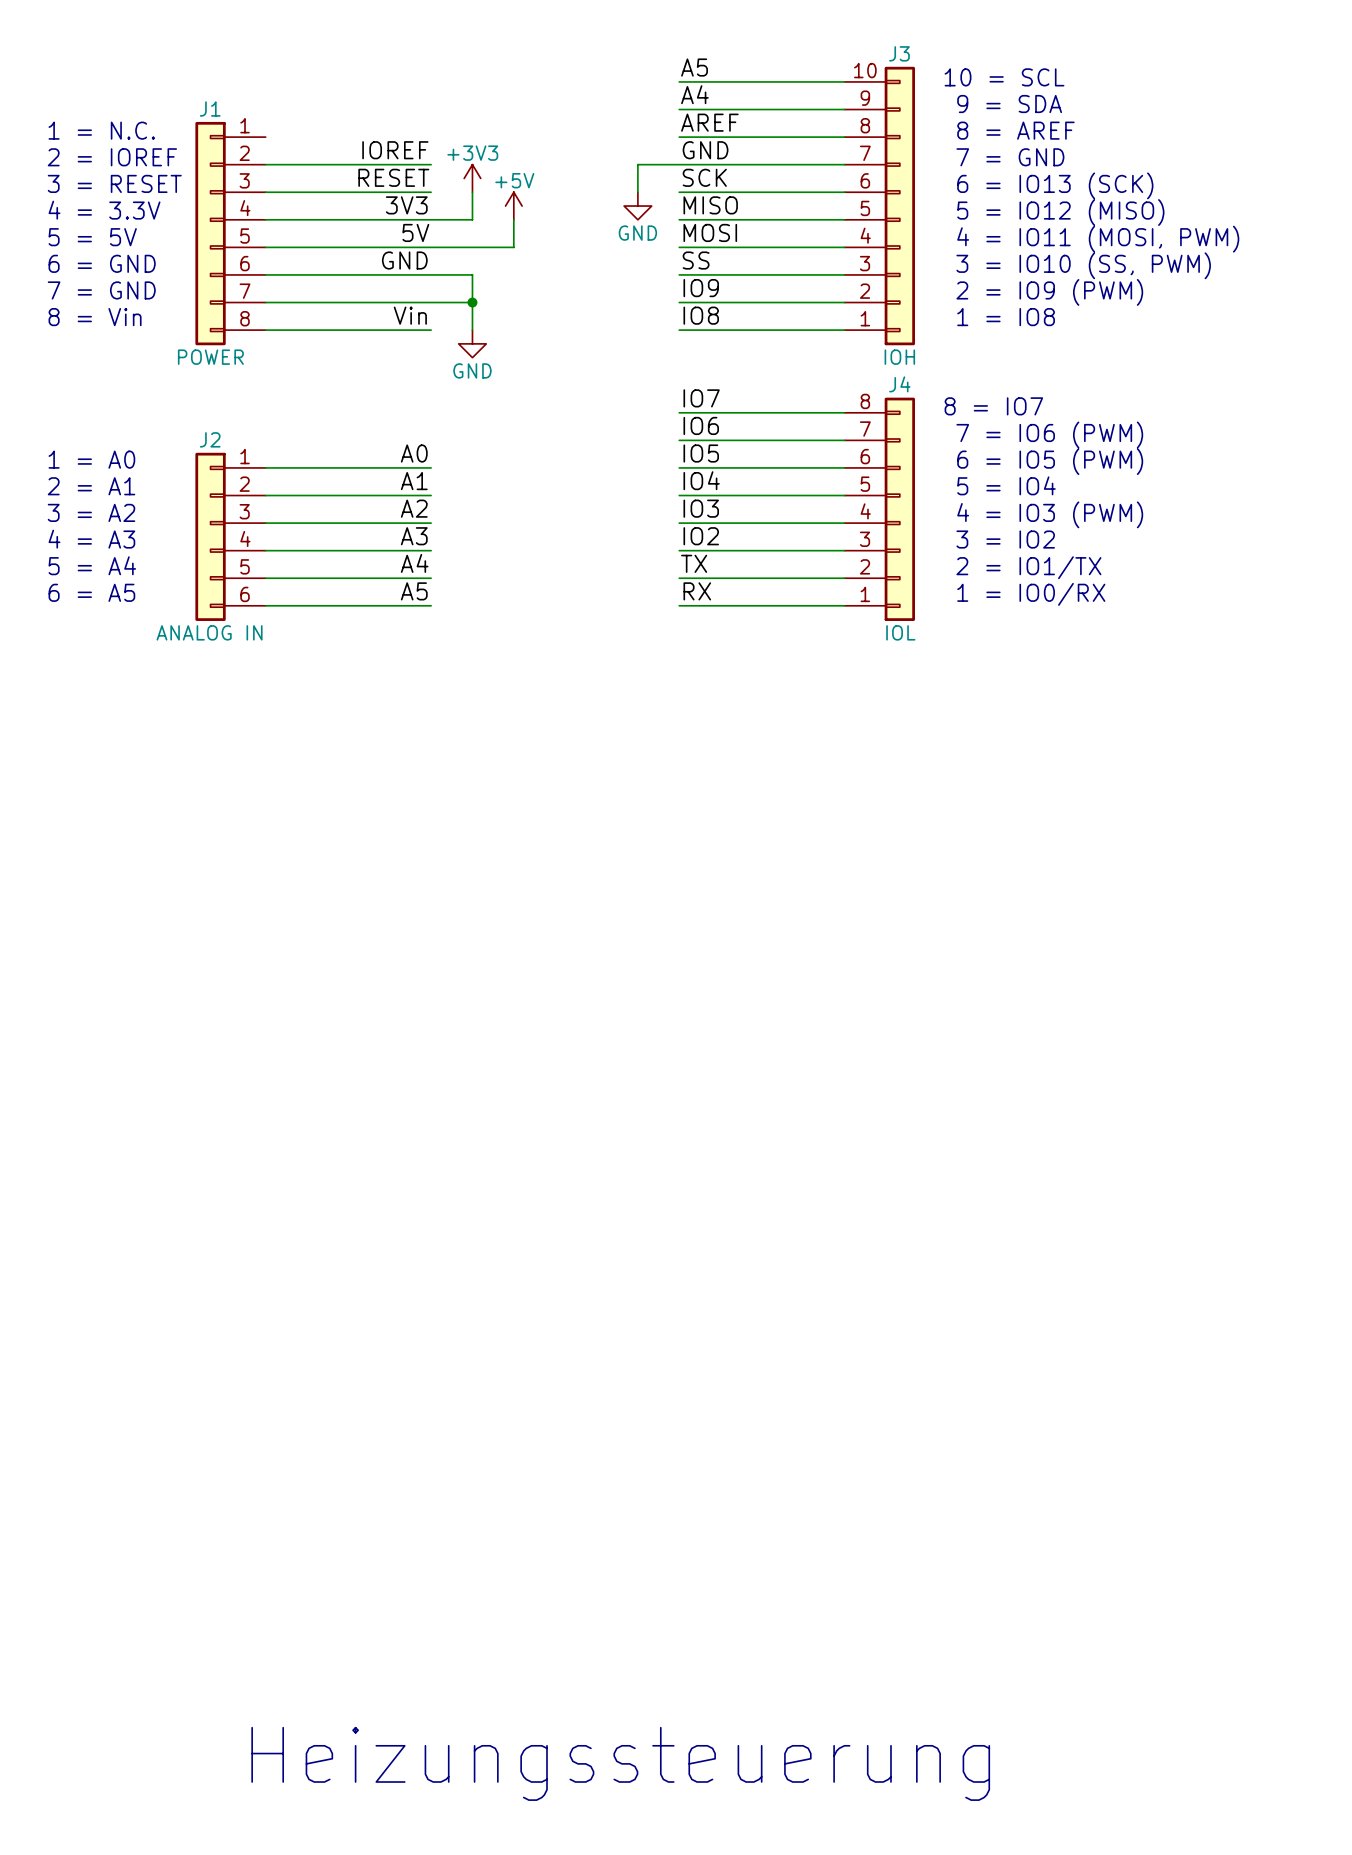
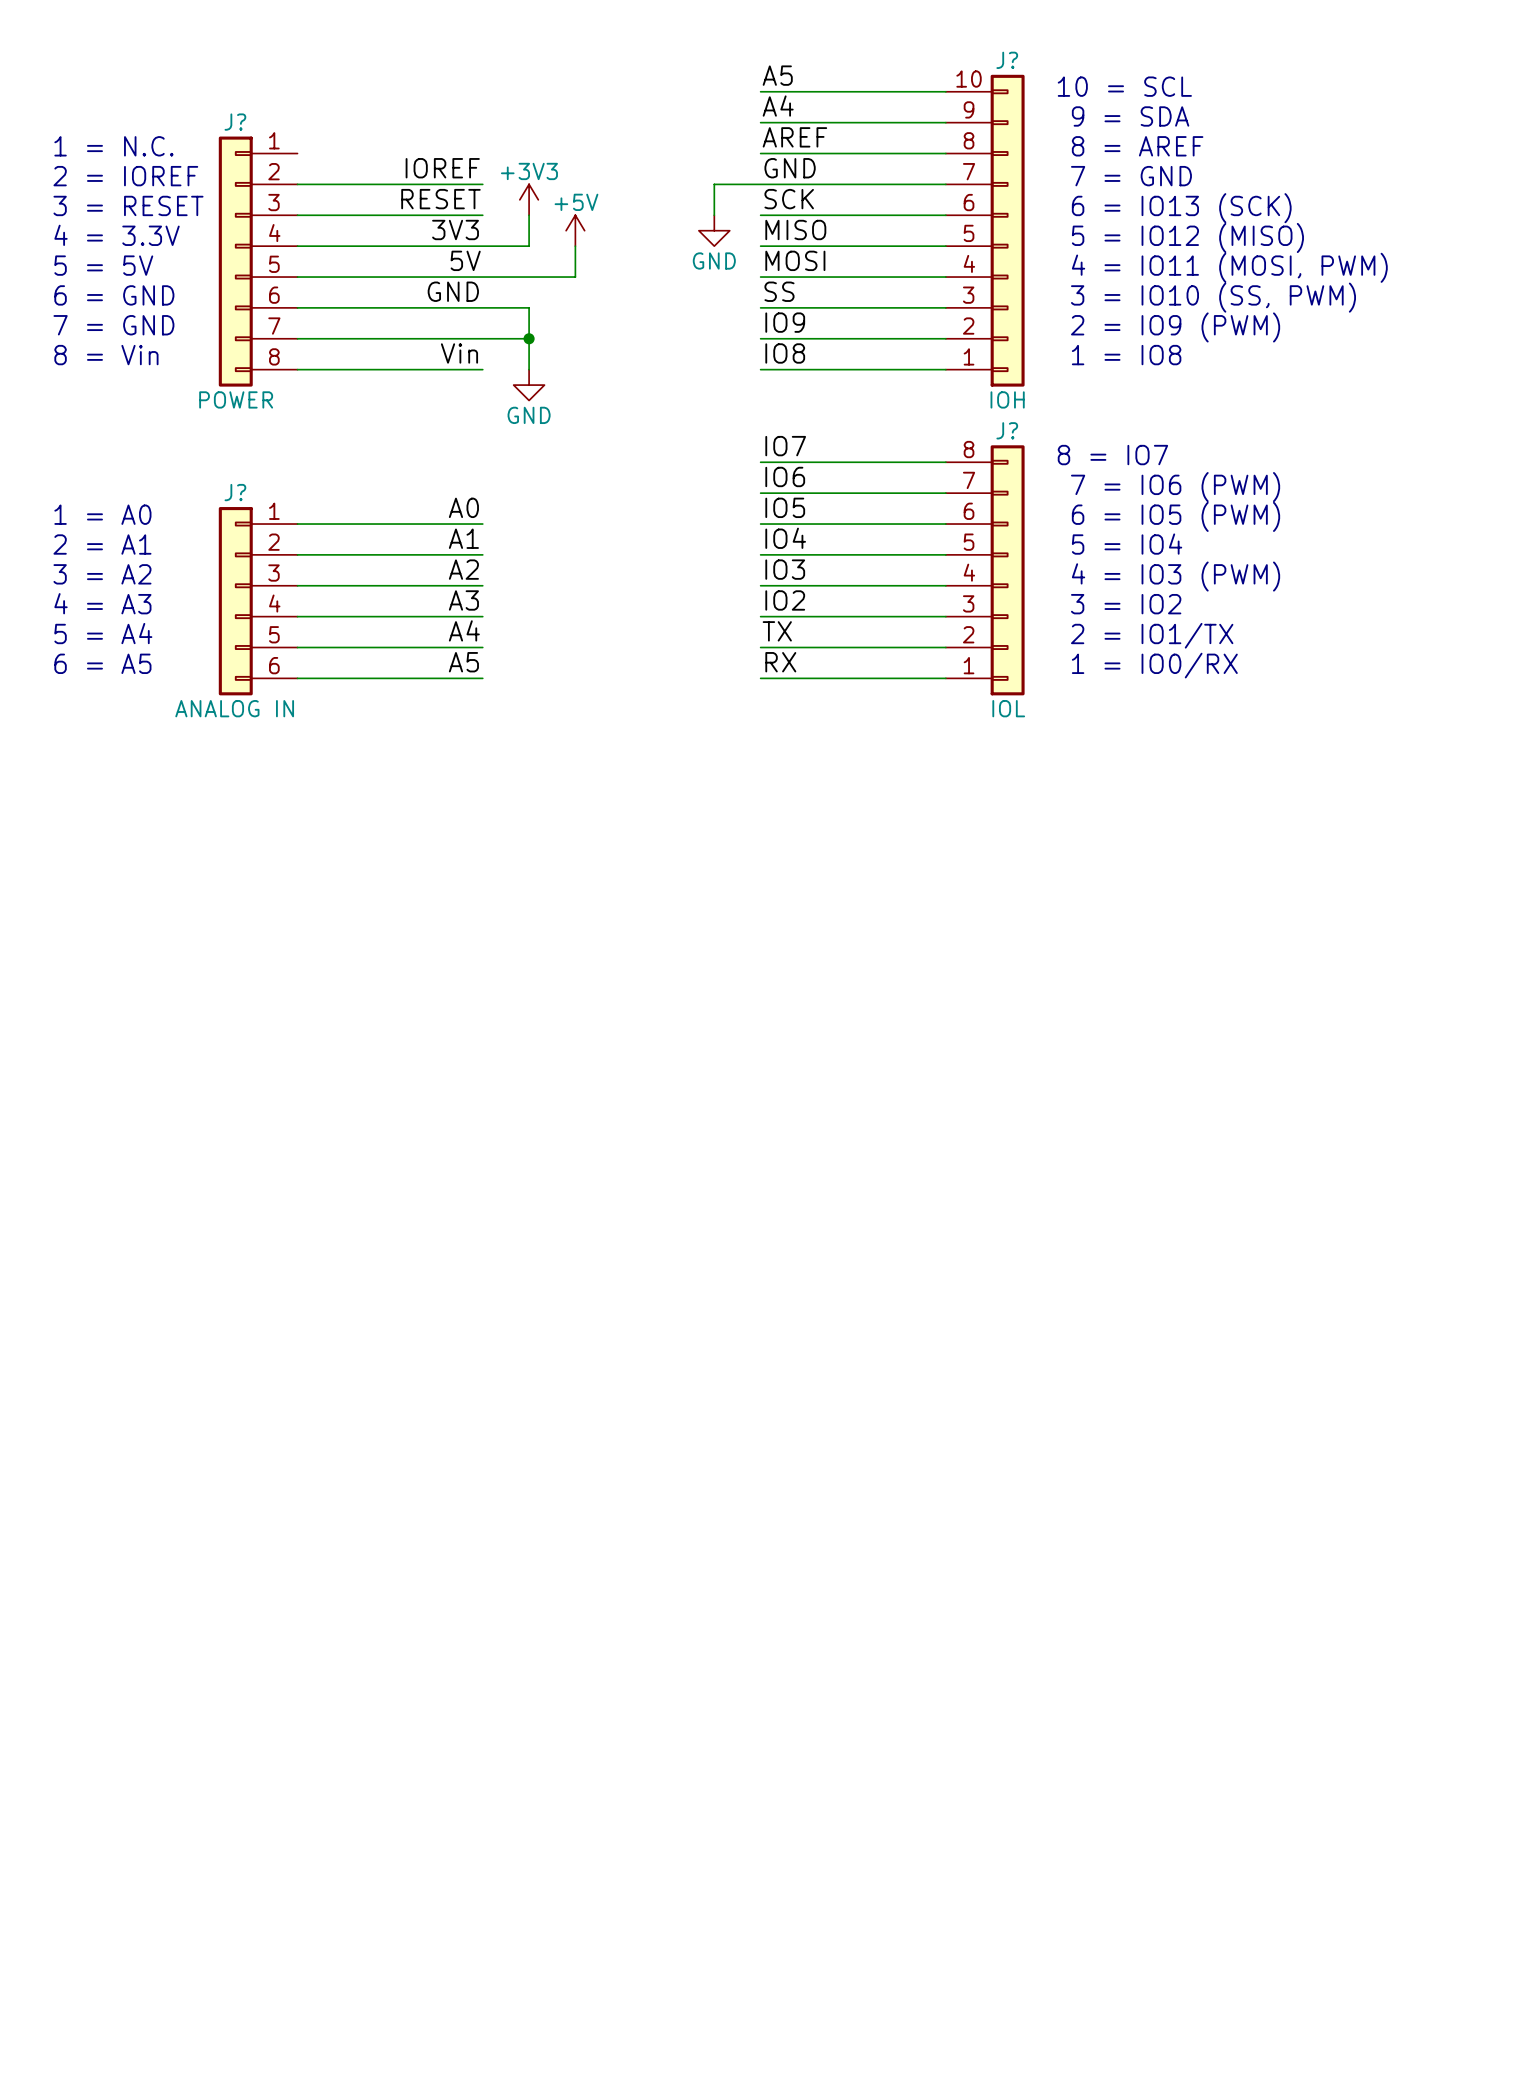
J3 name: J3 (899, 53) -> J? (1007, 60)
J1 name: J1 (210, 109) -> J? (235, 122)
J4 name: J4 (899, 384) -> J? (1007, 430)
J2 name: J2 (210, 439) -> J? (235, 492)
text: Heizungssteuerung (620, 1763) -> none

